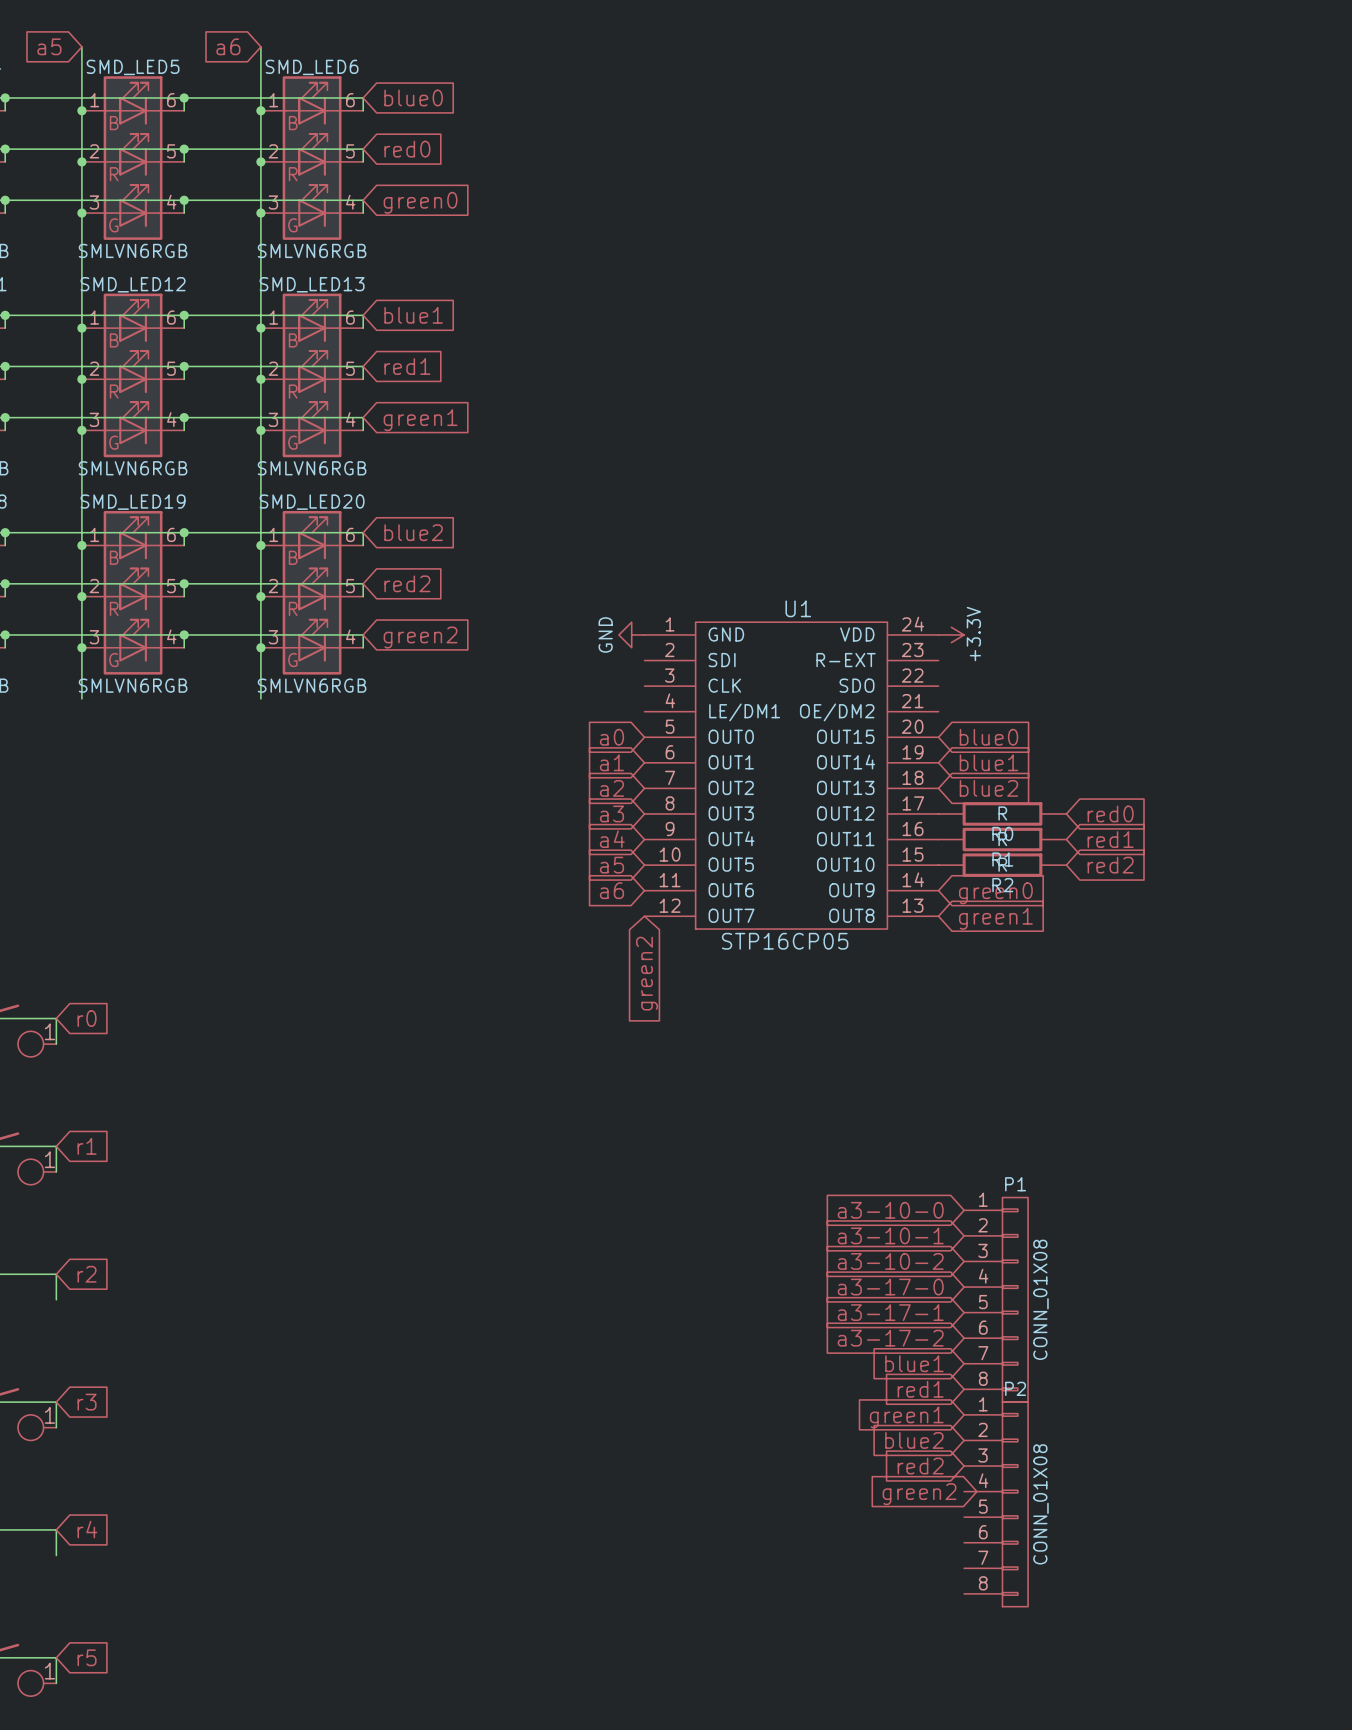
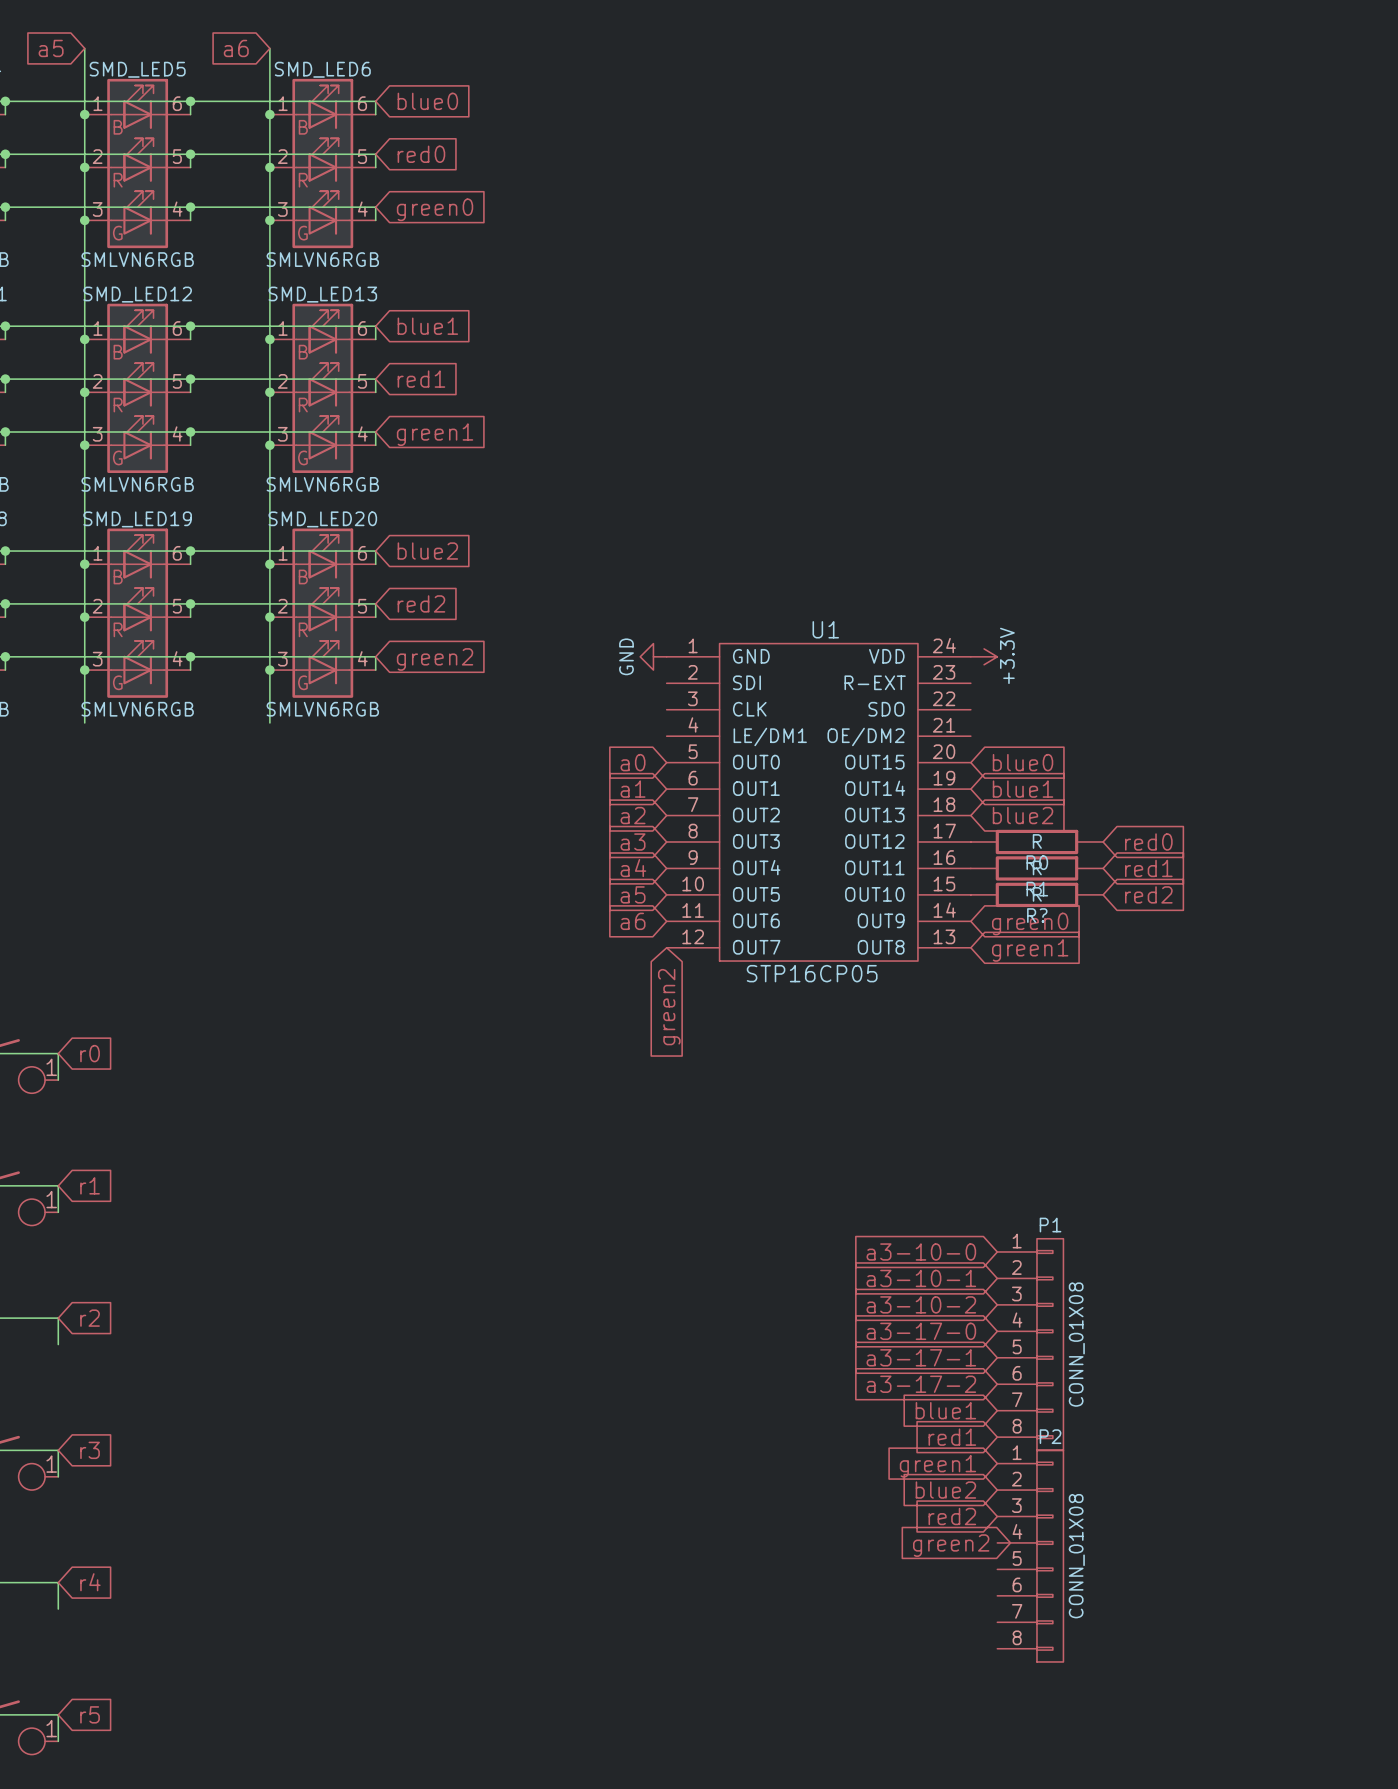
R2 name: R2 (1002, 885) -> R? (1037, 915)

